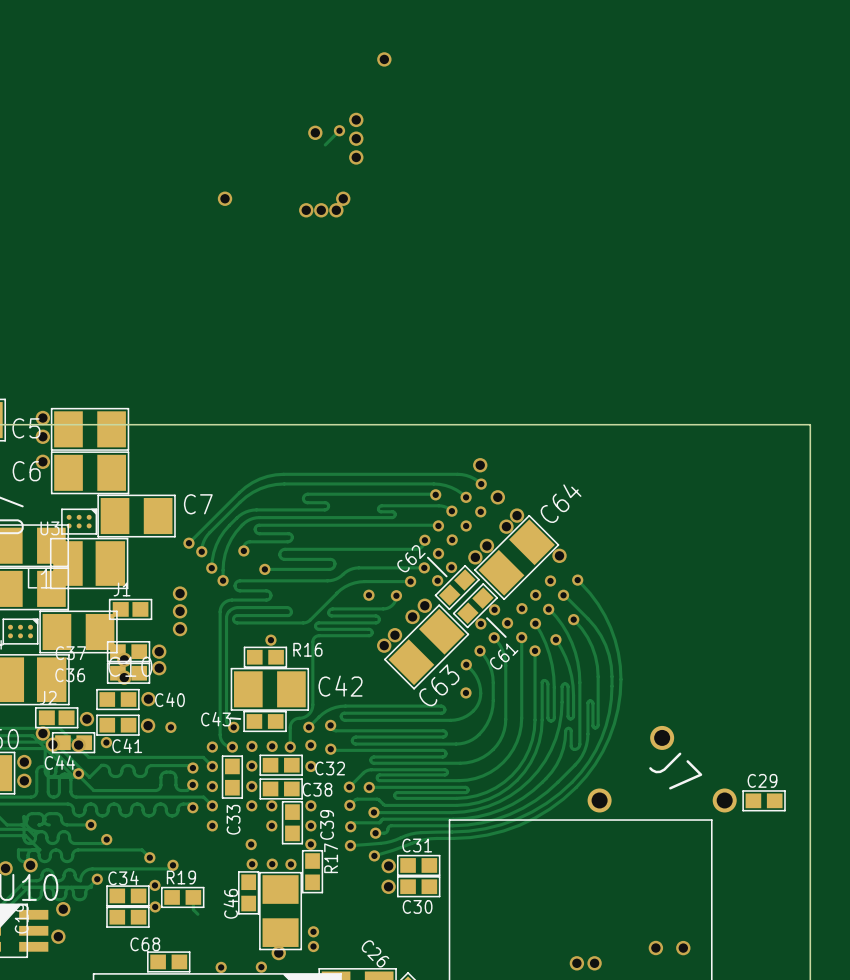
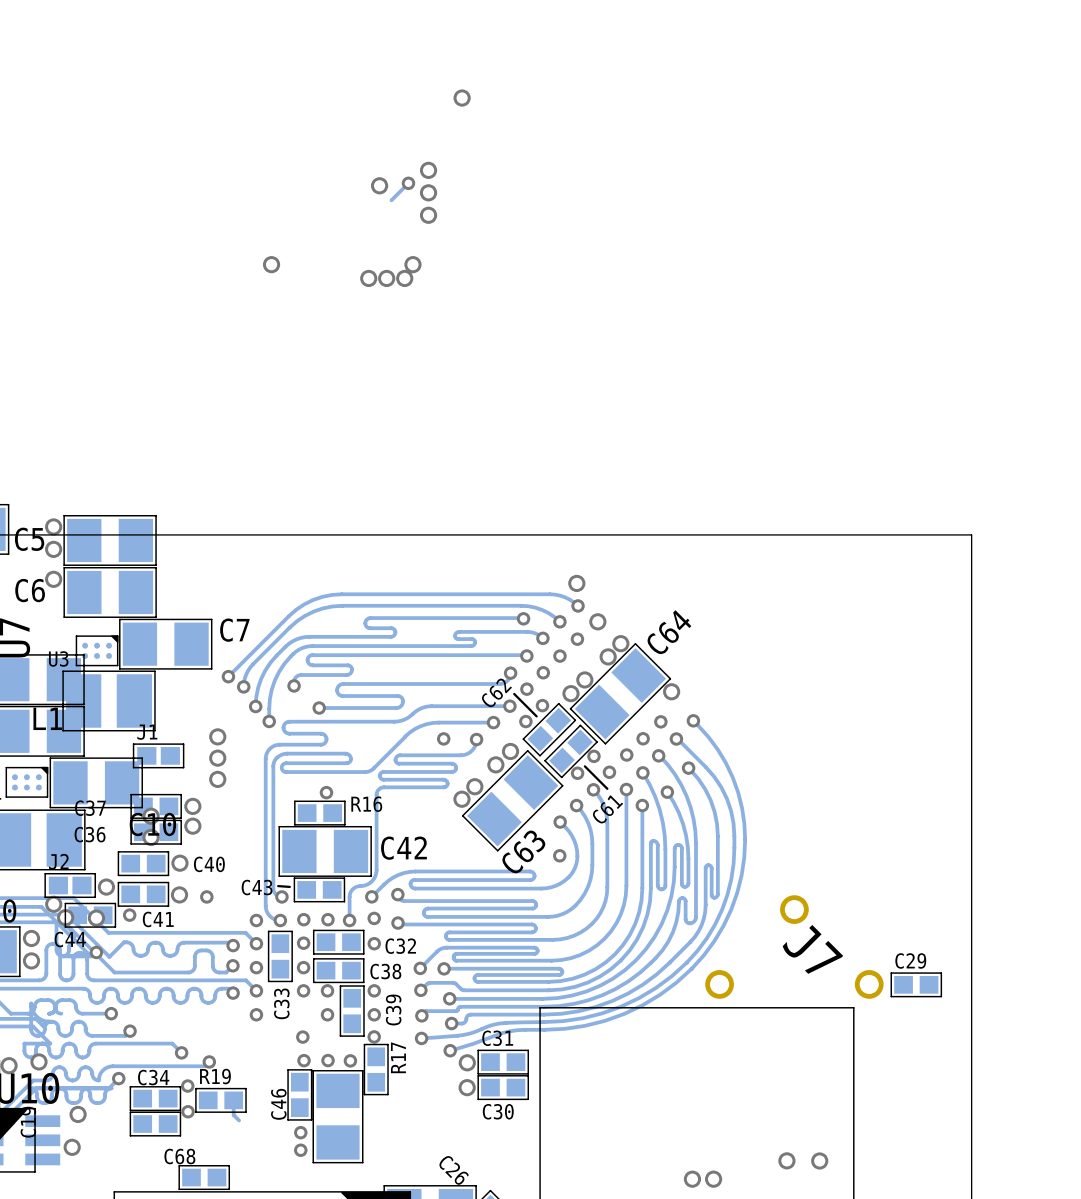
via: none -> (300, 1132)
via: (313, 931) -> none
via: none -> (300, 1150)
via: (313, 946) -> none
via: (278, 953) -> none
via: (221, 967) -> none
via: (261, 967) -> none

